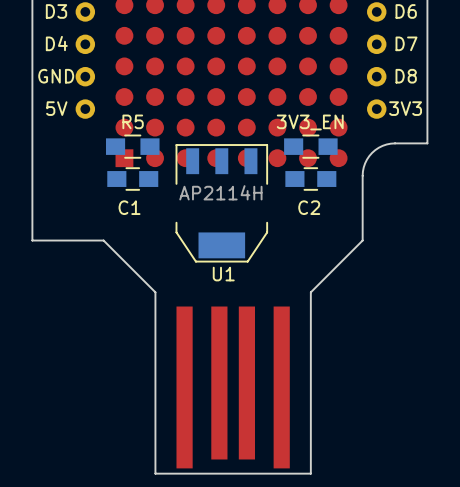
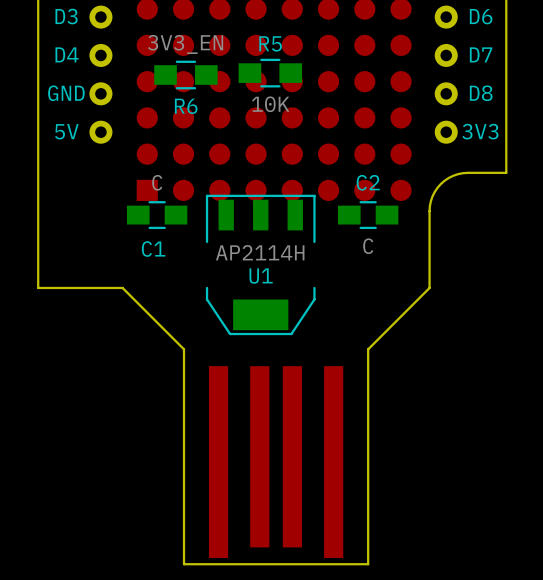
R6: none -> 3V3_EN (185, 75)
R5 value: none -> 10K (270, 104)
R5 position: (132, 146) -> (270, 73)
part: 3V3_EN (310, 146) -> none
C1 value: none -> C (157, 182)
U1 position: (221, 203) -> (260, 264)
C2 value: none -> C (368, 246)
C2 name position: C2 (309, 207) -> C2 (368, 182)
U1 name position: U1 (223, 274) -> U1 (261, 276)

